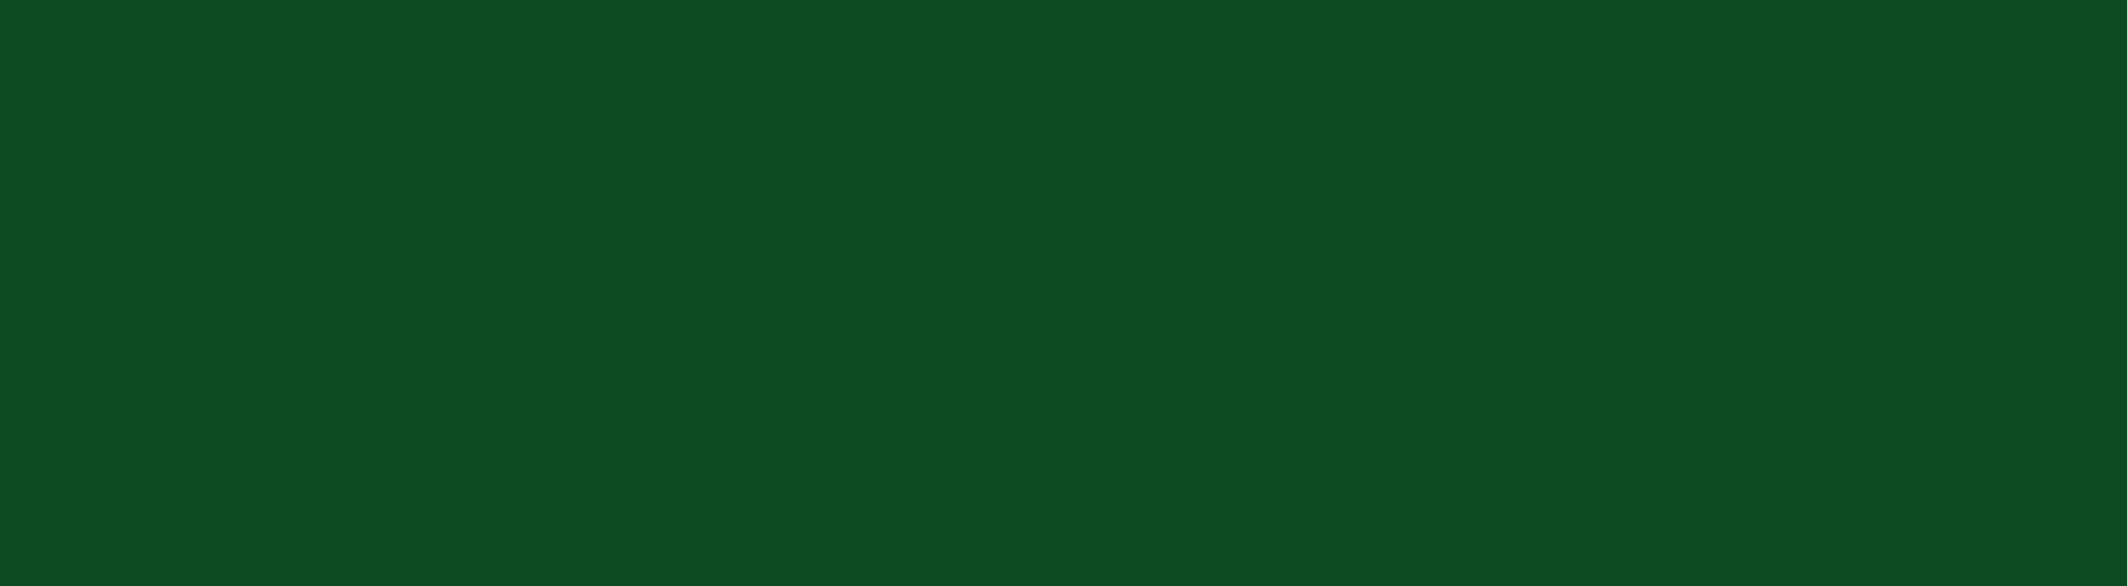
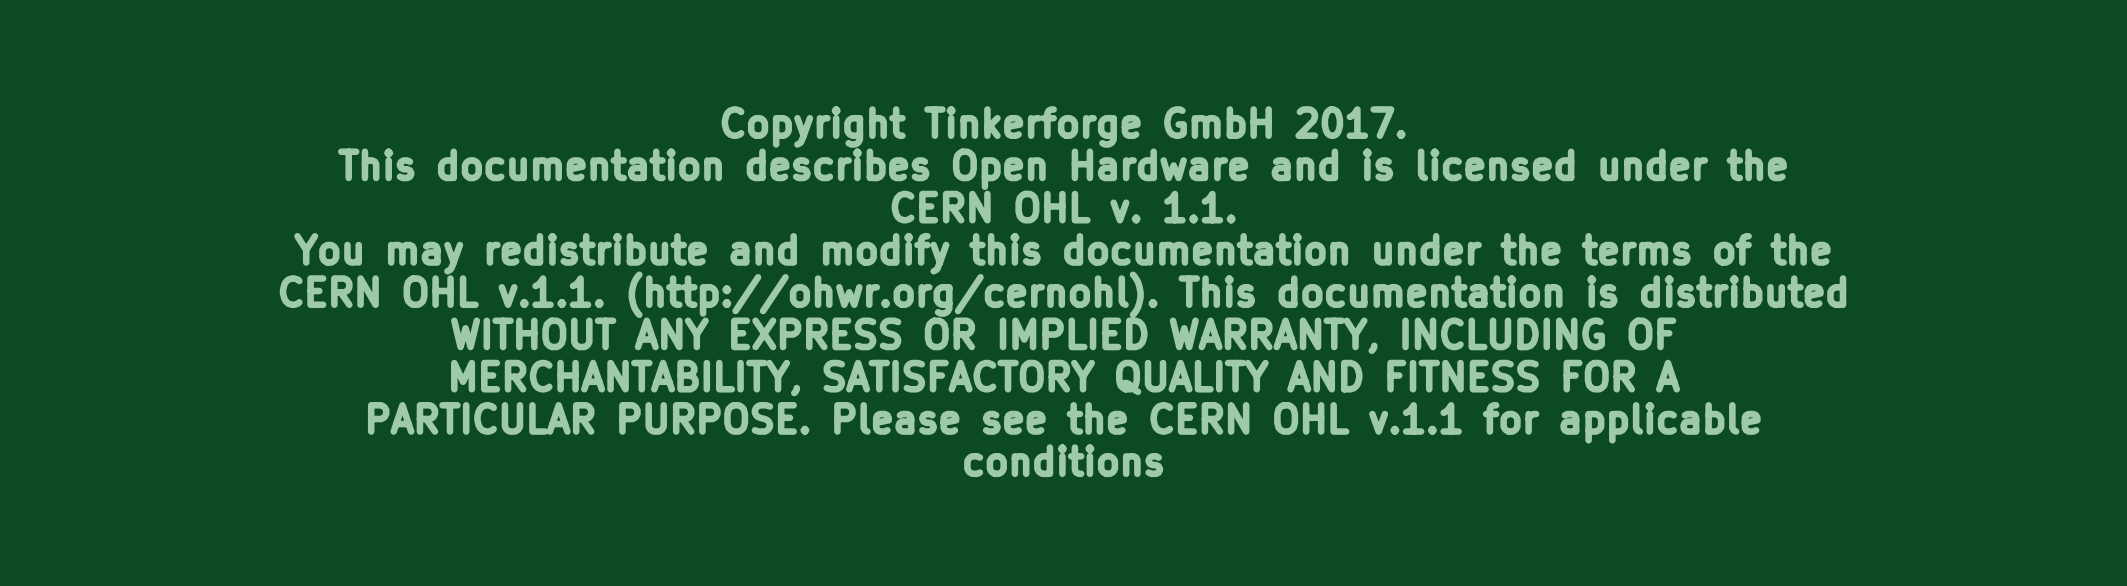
text: none -> Copyright Tinkerforge GmbH 2017. (1063, 126)
text: none -> This documentation describes Open Hardware and is licensed under the (1062, 169)
text: none -> CERN OHL v. 1.1. (1063, 207)
text: none -> You may redistribute and modify this documentation under the terms of the (1062, 253)
text: none -> CERN OHL v.1.1. (http://ohwr.org/cernohl). This documentation is distributed (1063, 294)
text: none -> WITHOUT ANY EXPRESS OR IMPLIED WARRANTY, INCLUDING OF (1063, 335)
text: none -> MERCHANTABILITY, SATISFACTORY QUALITY AND FITNESS FOR A (1065, 378)
text: none -> PARTICULAR PURPOSE. Please see the CERN OHL v.1.1 for applicable (1064, 422)
text: none -> conditions (1063, 460)

